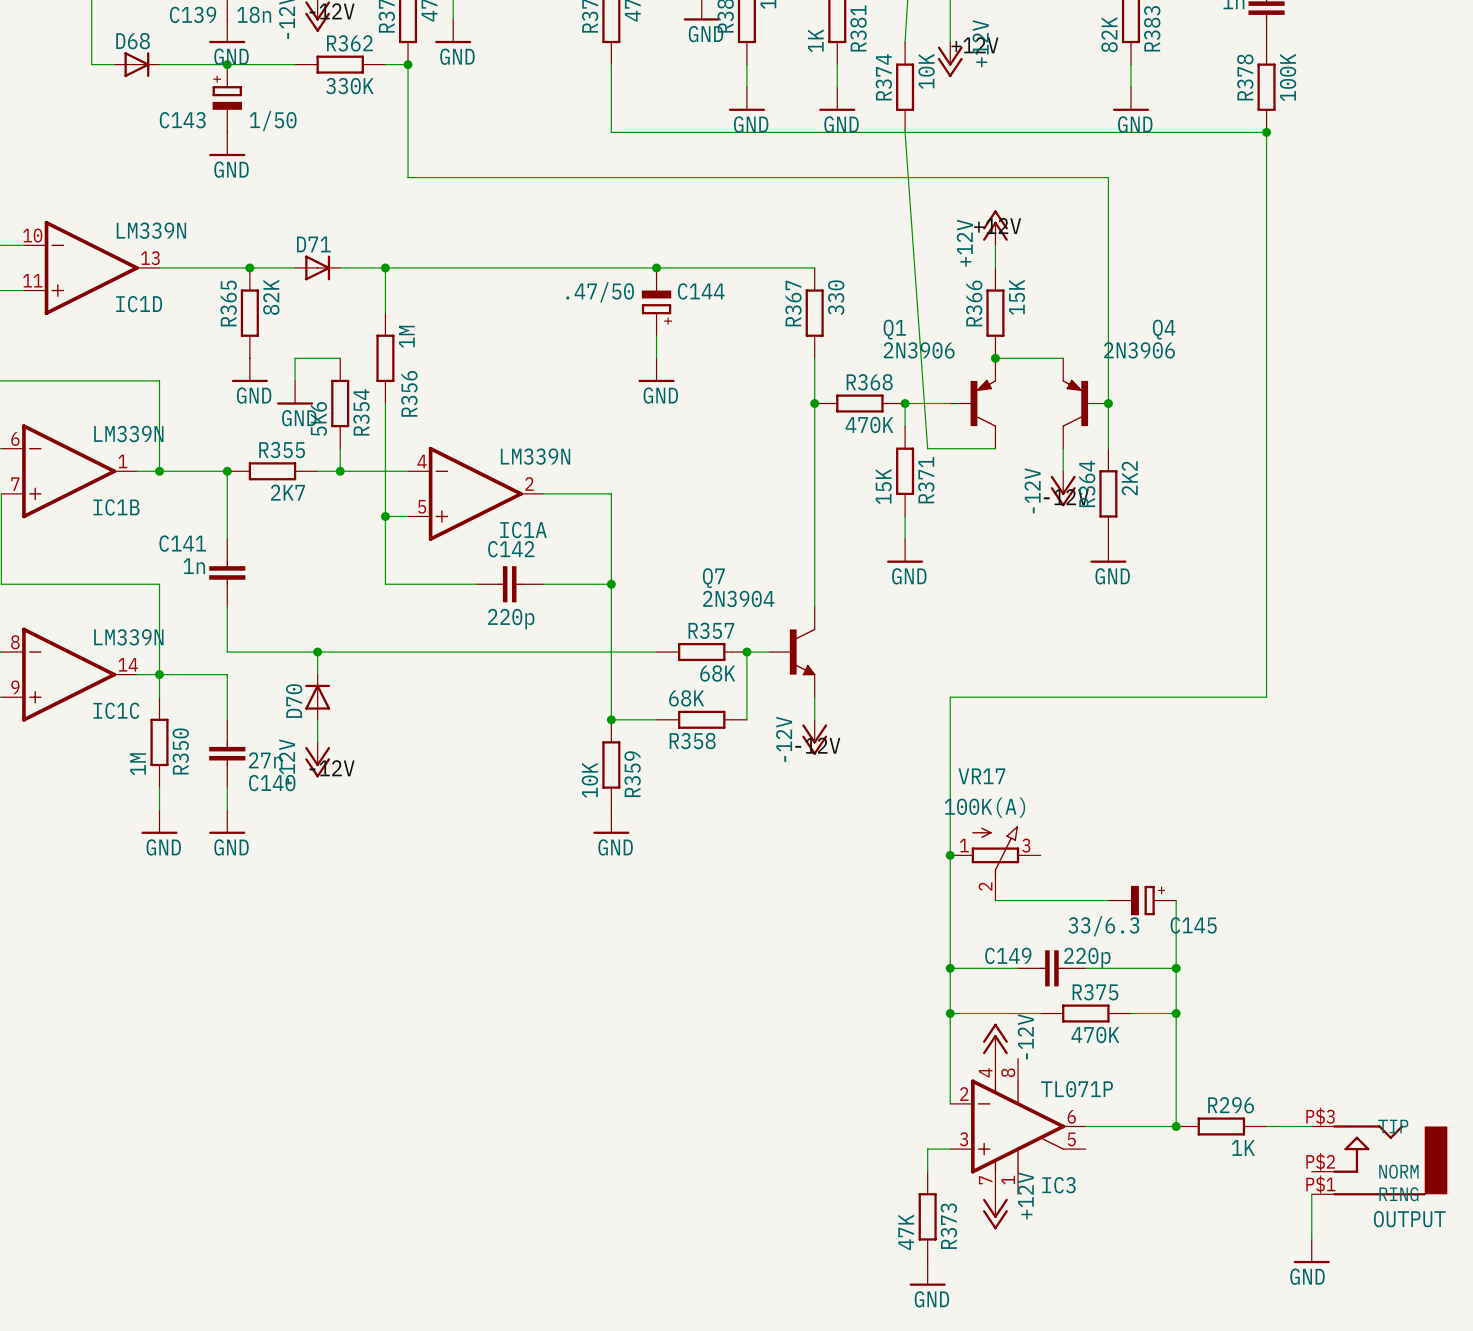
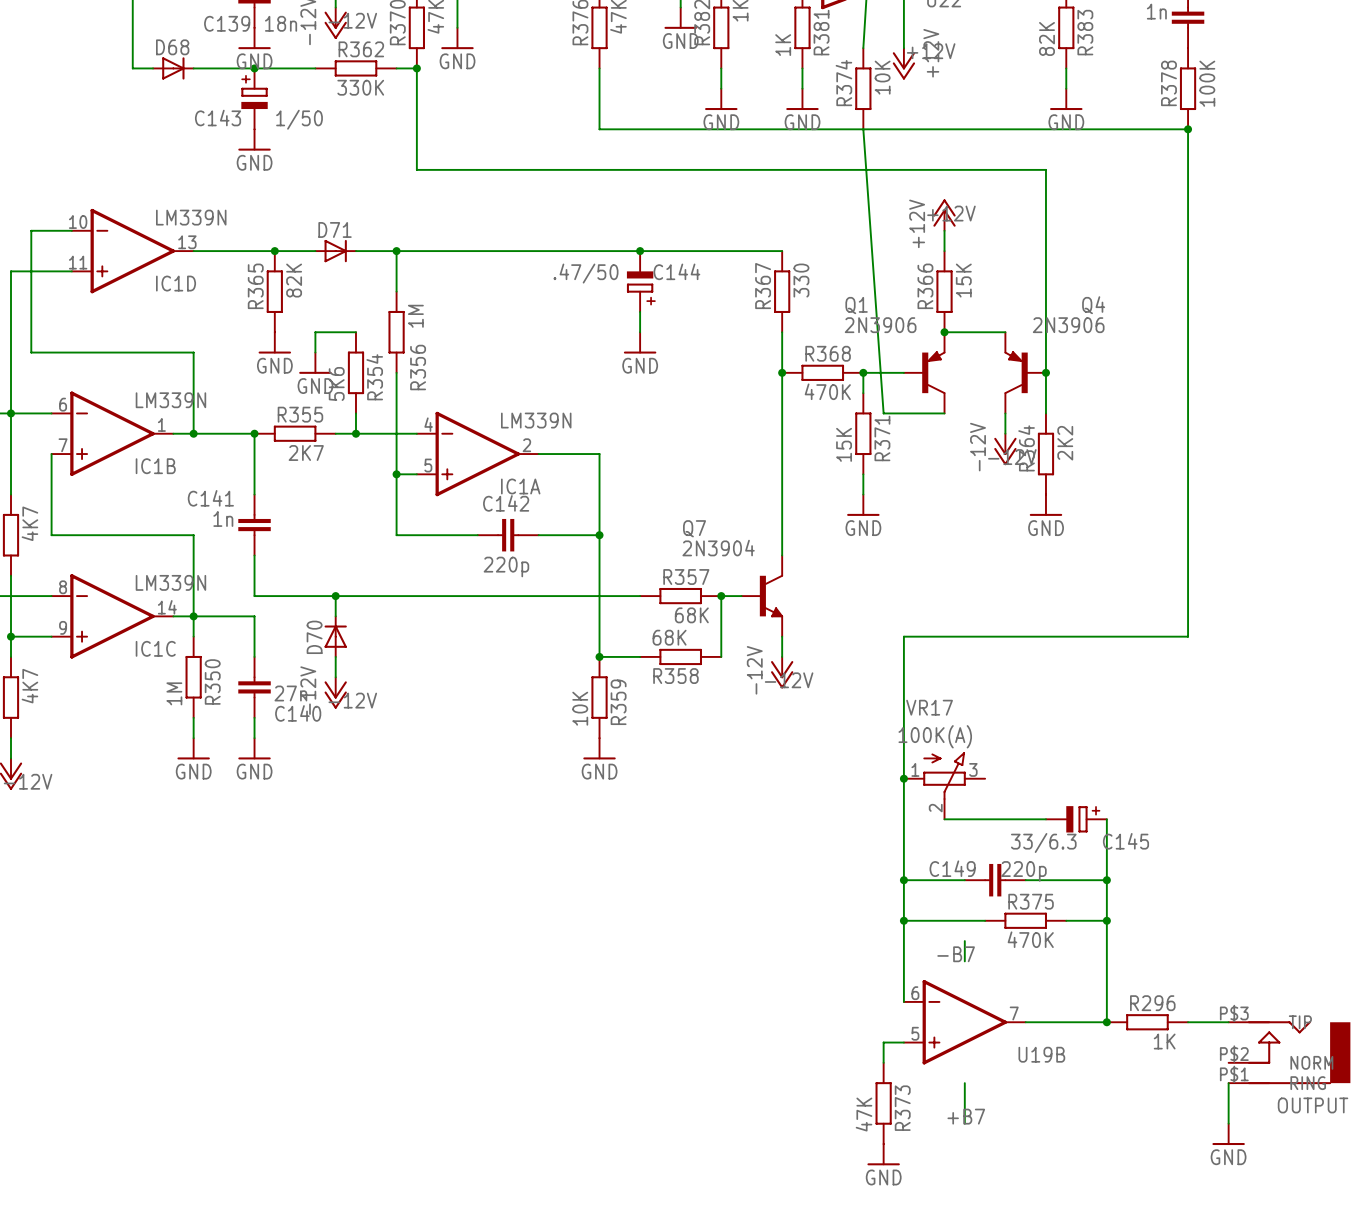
wire: none -> (964, 941) (964, 961)
power symbol: -12V (995, 1041) -> none
label: none -> -B7 (956, 954)
IC3: TL071P (1018, 1126) -> none
U19B: none -> (964, 1022)
wire: none -> (964, 1083) (964, 1123)
power symbol: +12V (995, 1211) -> none
label: none -> +B7 (966, 1116)

